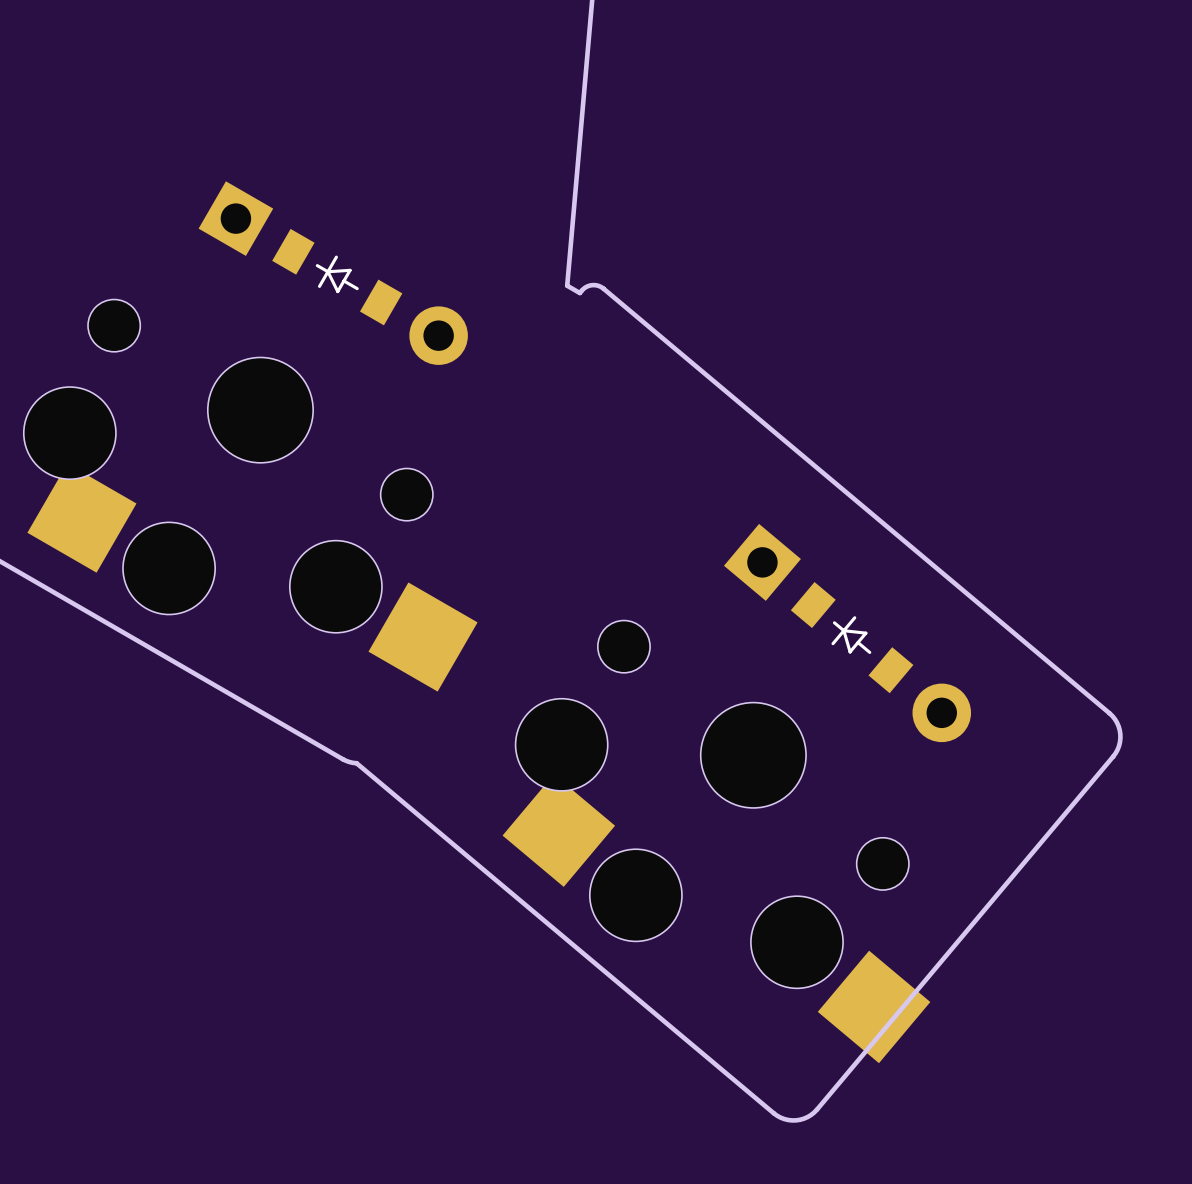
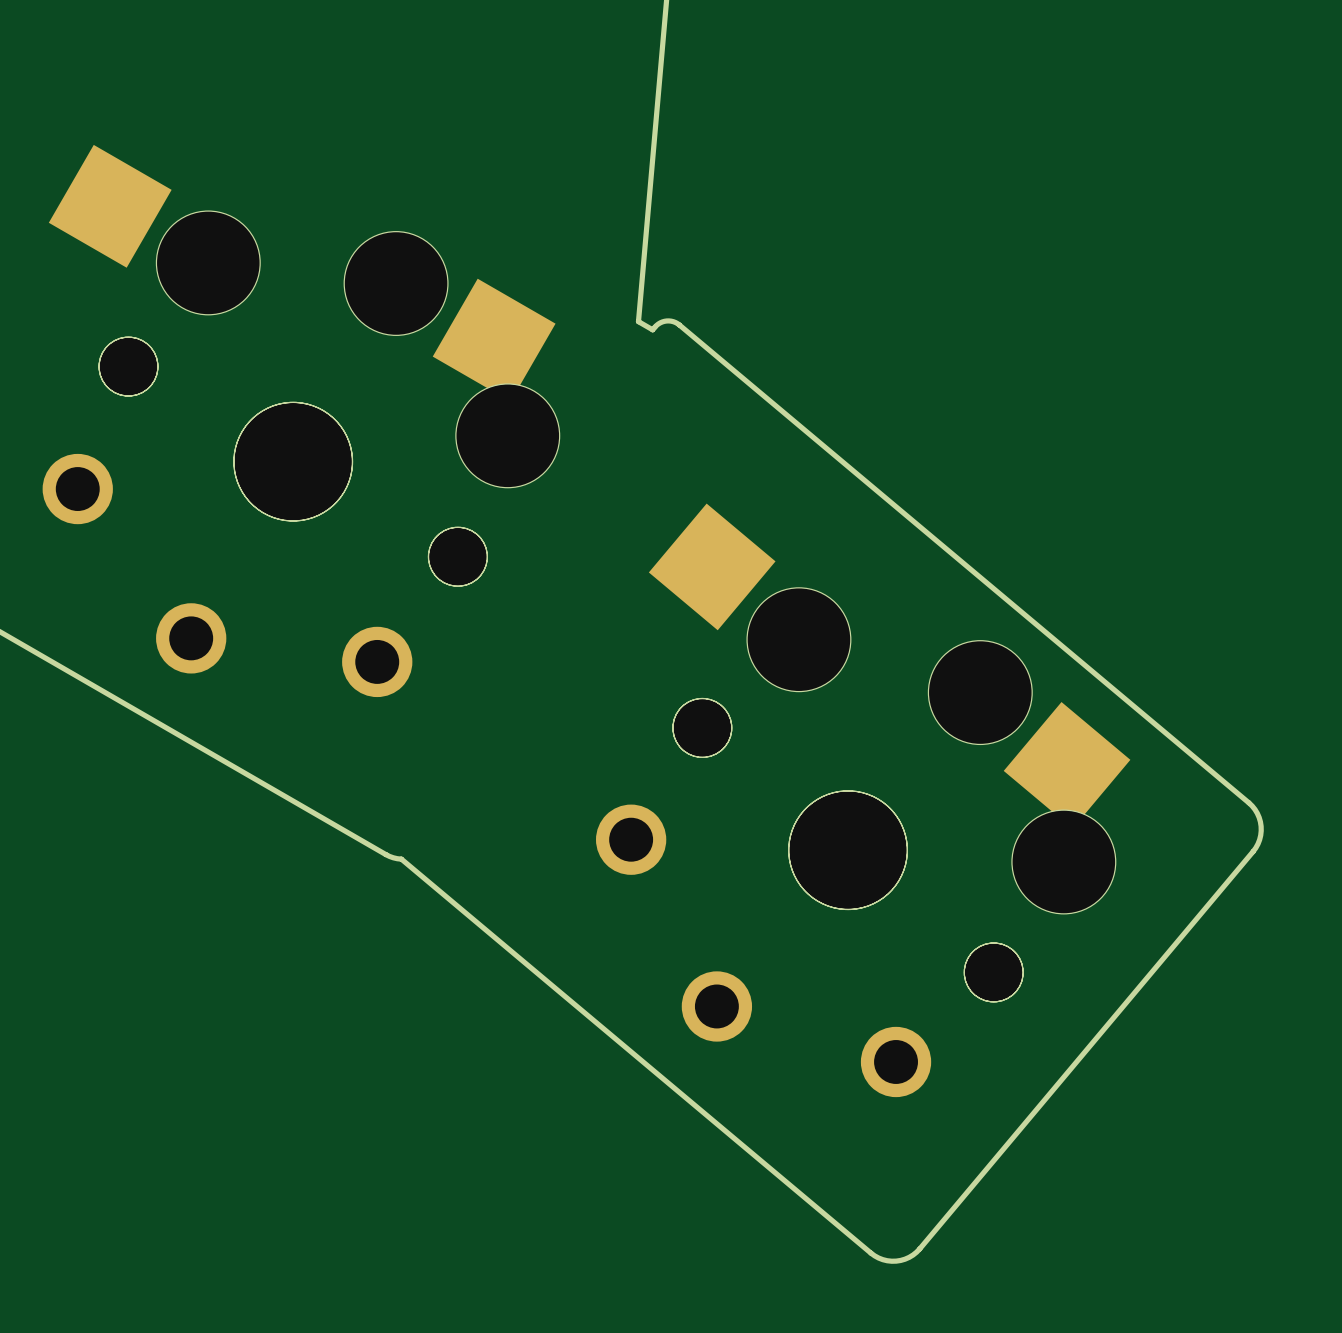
part: (333, 273) -> none
part: none -> (264, 517)
part rotation: 0° (250, 495) -> 180° (304, 365)
part: (847, 633) -> none
part: none -> (809, 897)
part rotation: 0° (716, 841) -> 180° (889, 752)

